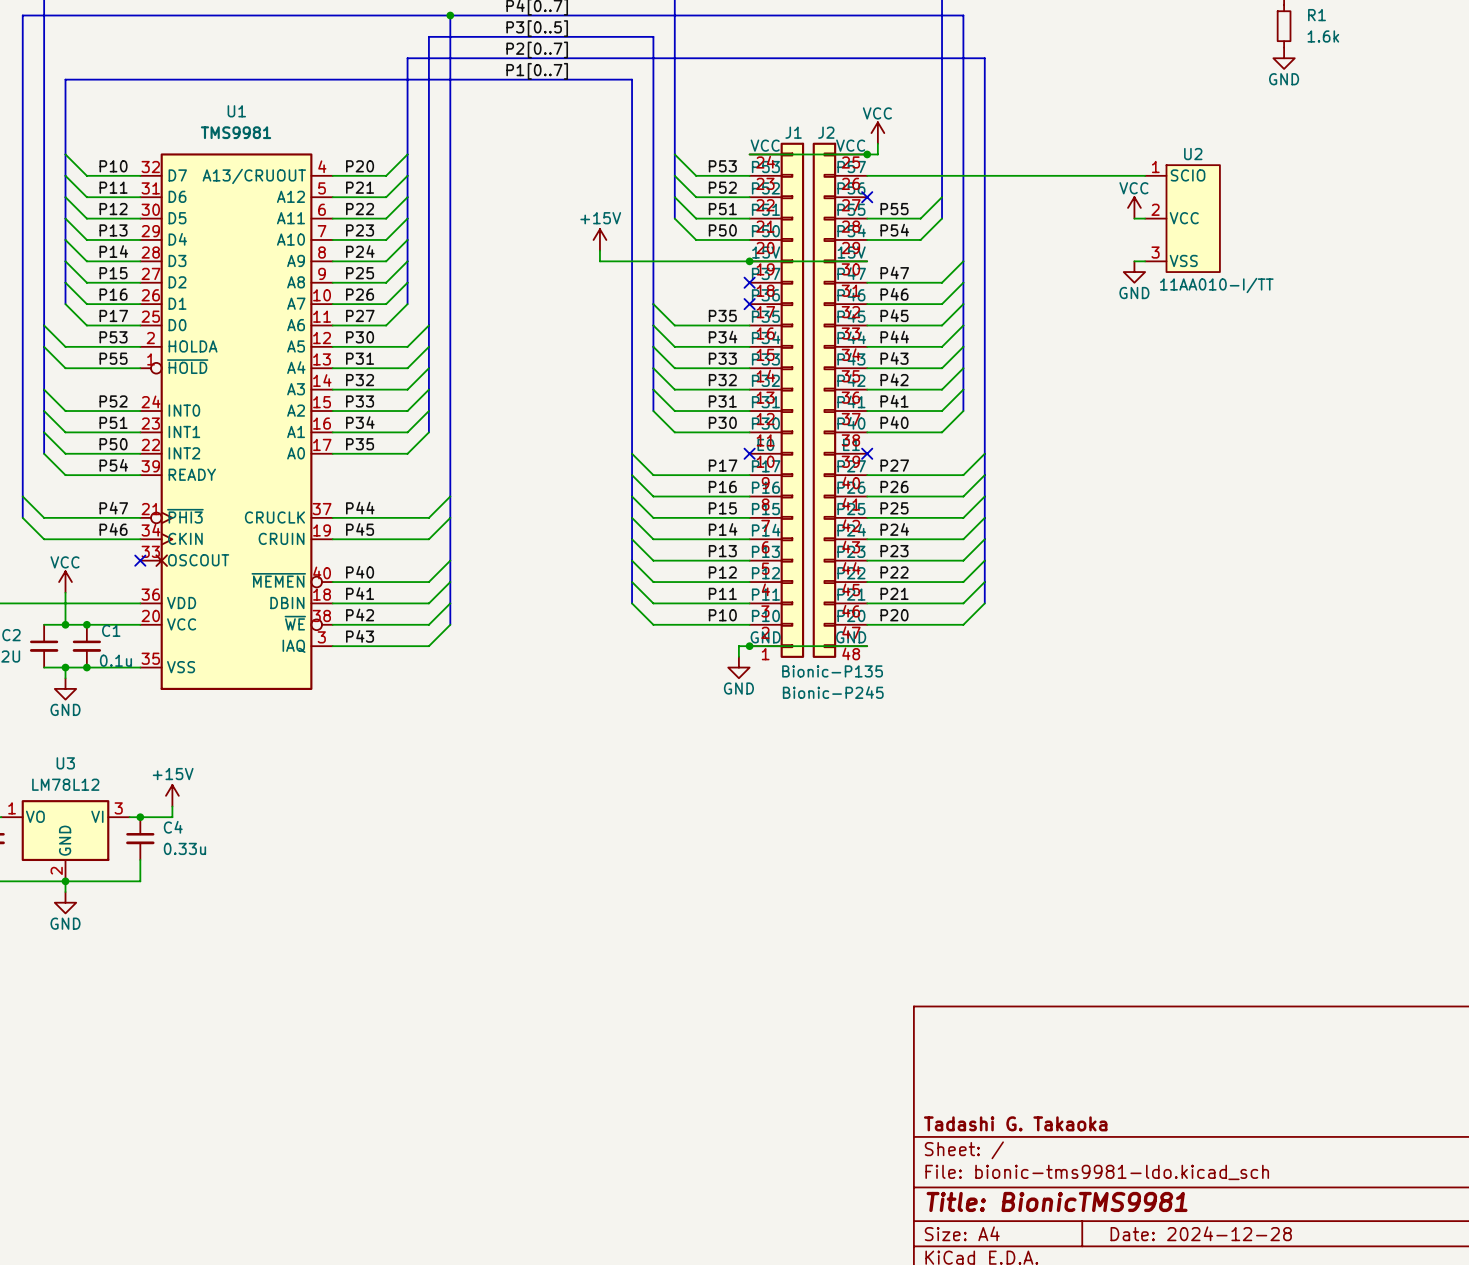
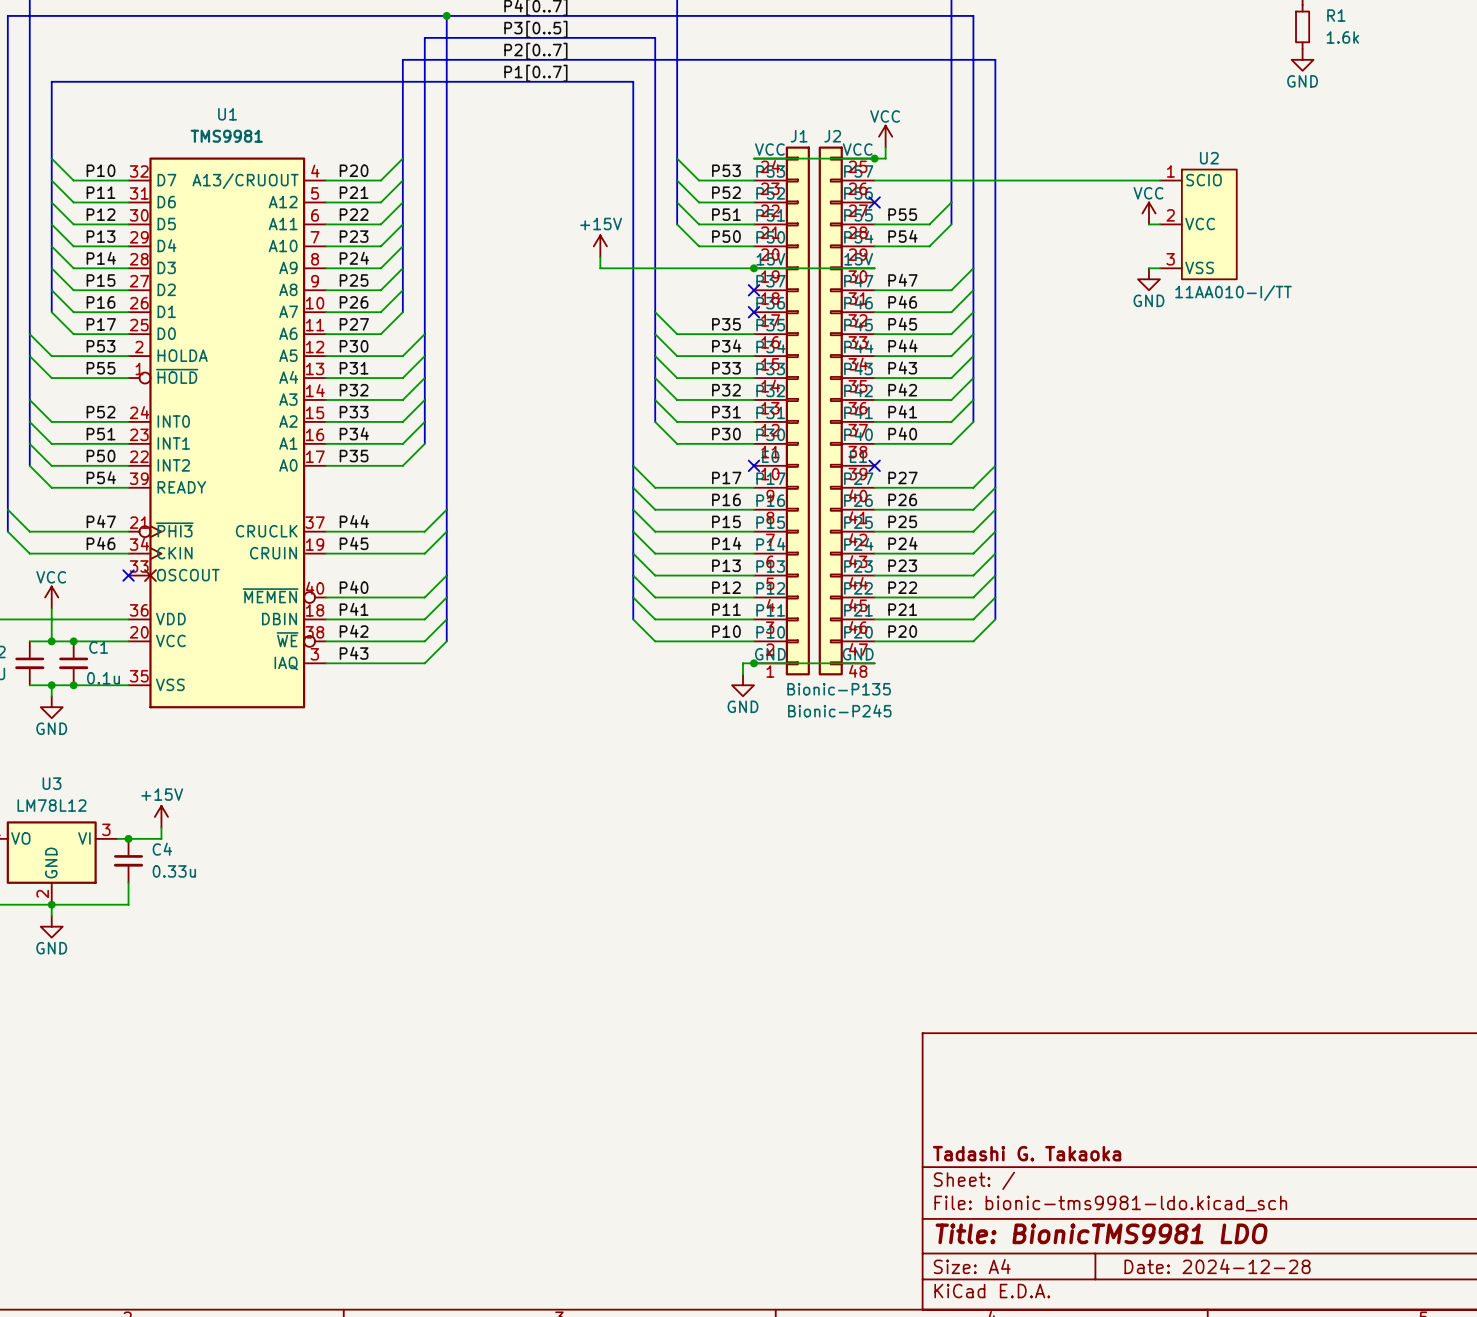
title block: Title: BionicTMS9981 (1057, 1201) -> Title: BionicTMS9981 LDO (1101, 1233)

